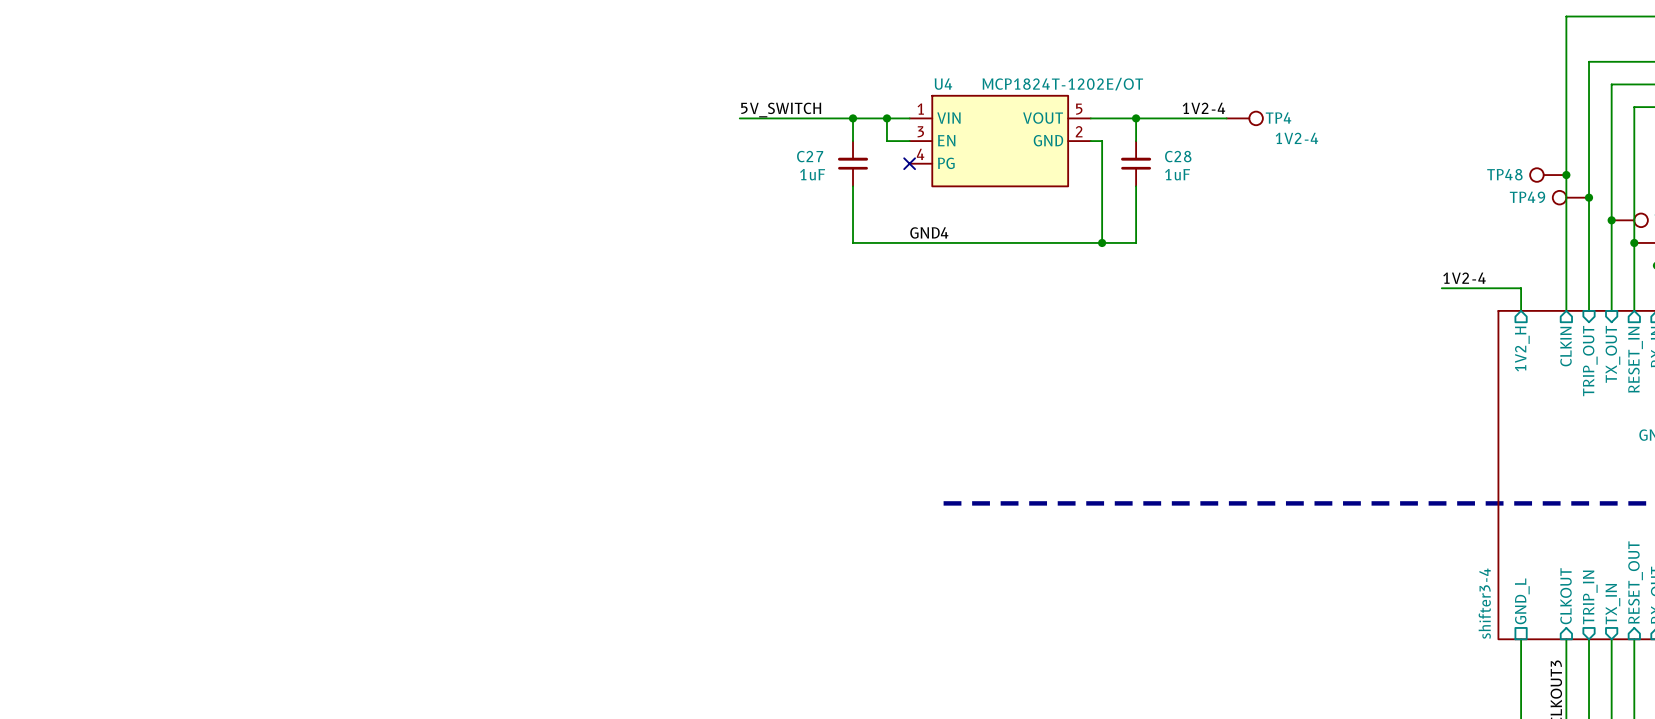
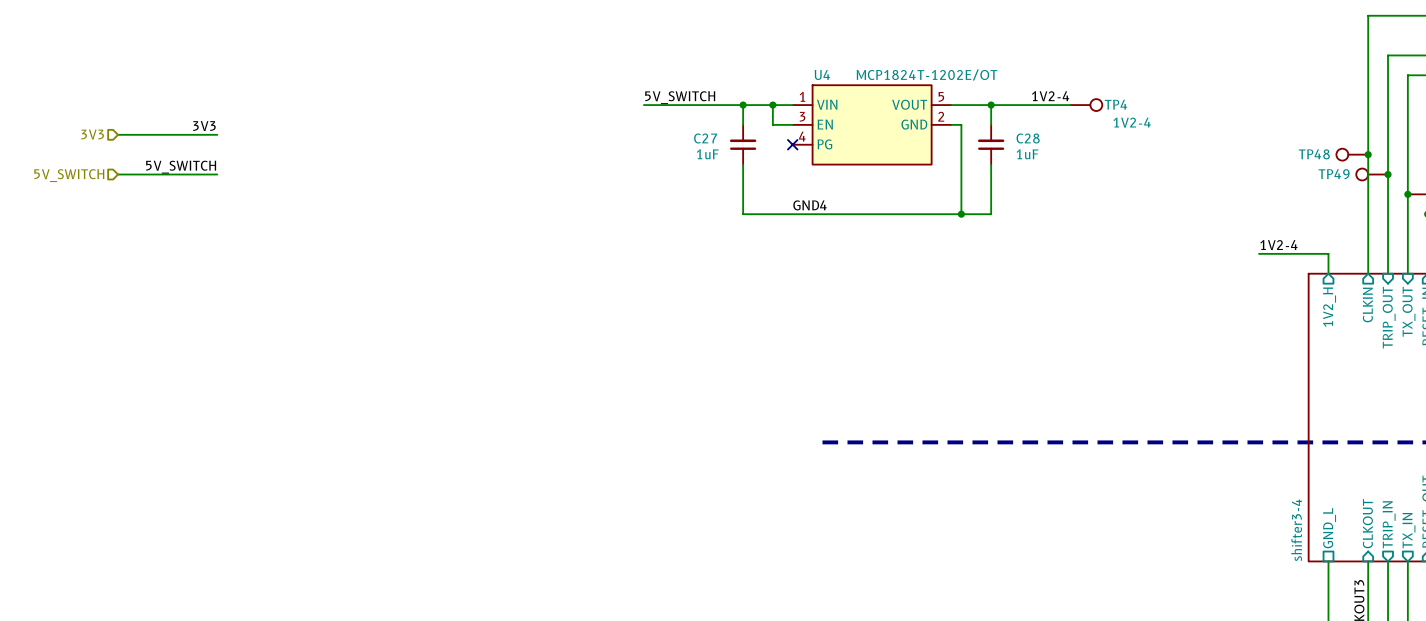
label: none -> 3V3 (204, 126)
hierarchical label: none -> 3V3 (92, 134)
wire: none -> (118, 134) (217, 134)
label: none -> 5V_SWITCH (181, 167)
wire: none -> (118, 174) (217, 174)
hierarchical label: none -> 5V_SWITCH (69, 175)

